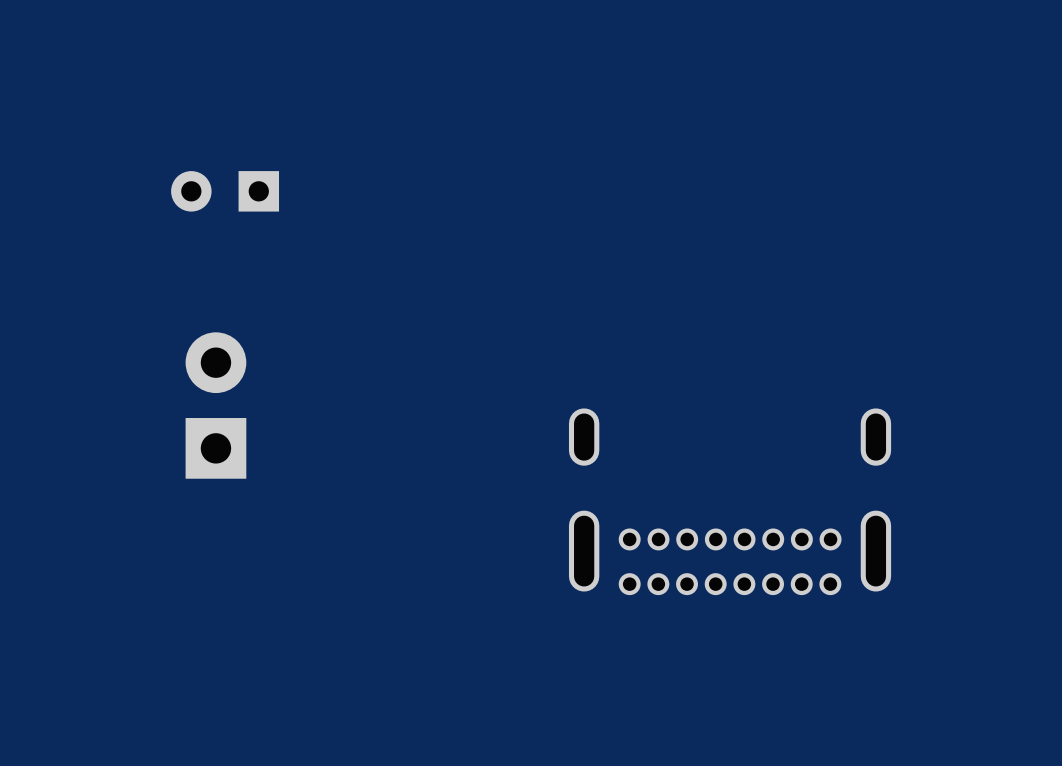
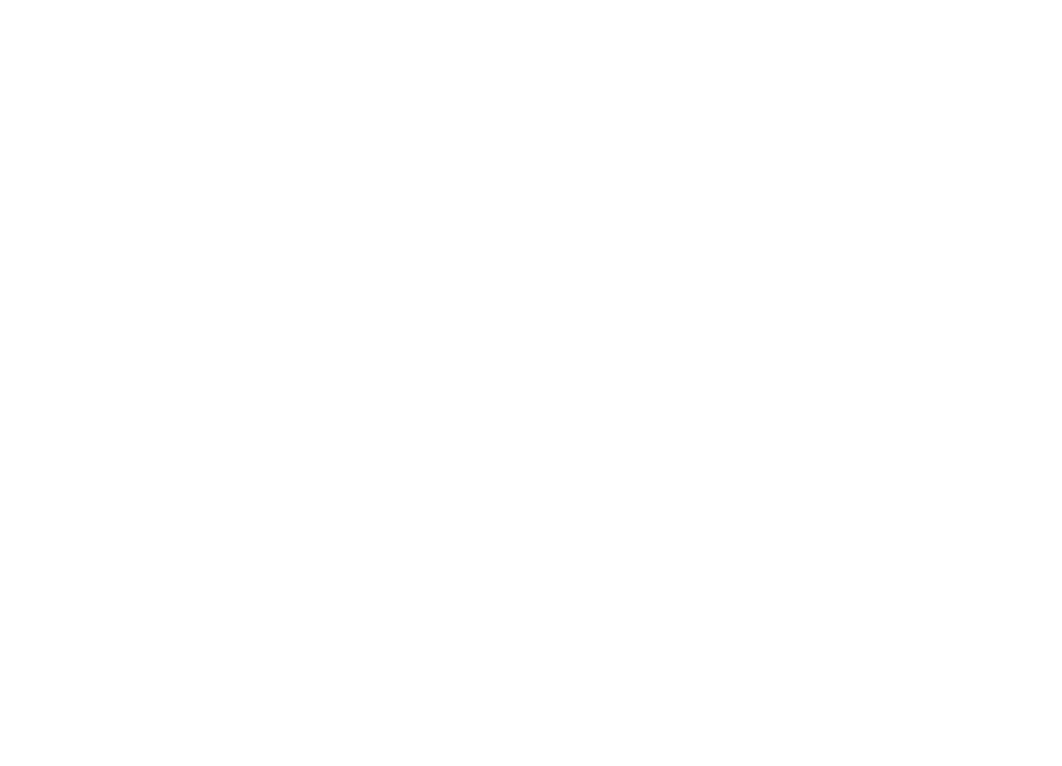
part: (225, 191) -> none
part: (215, 405) -> none
part: (730, 501) -> none

